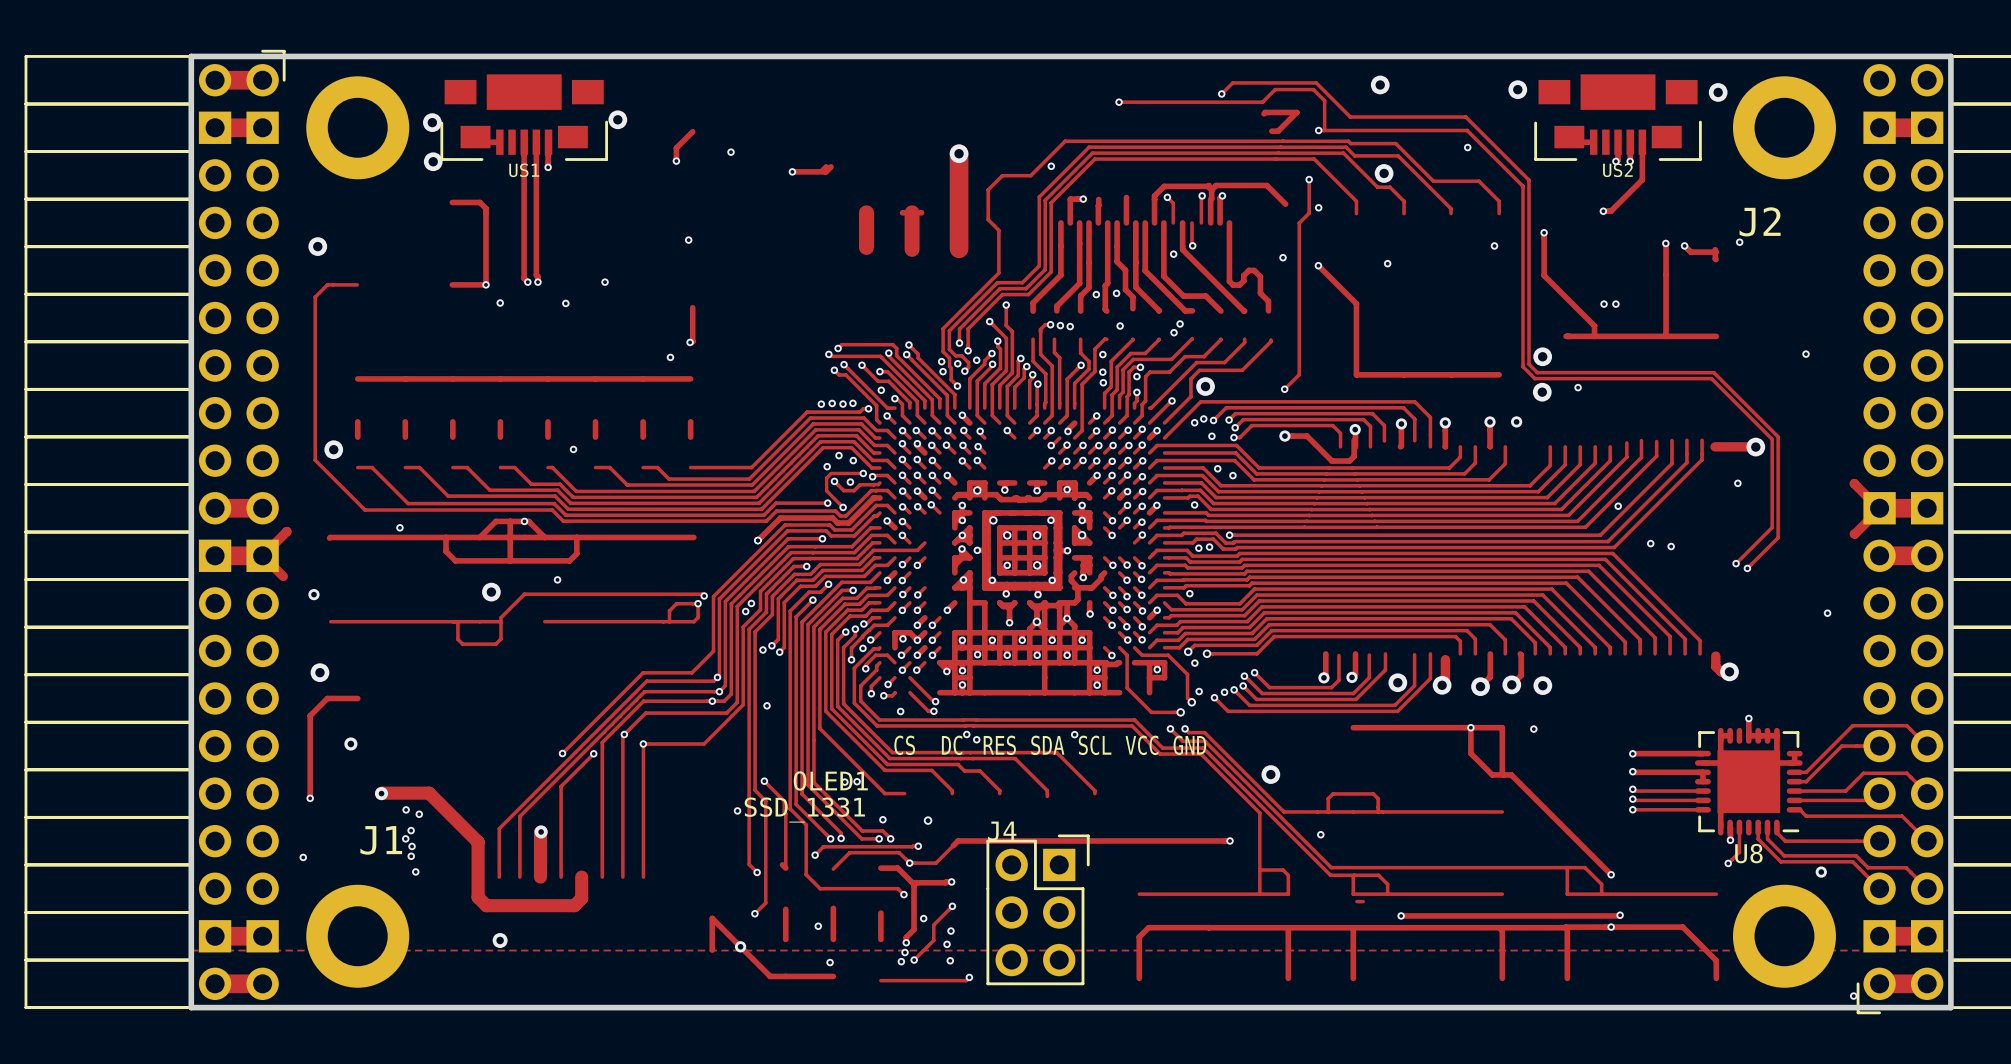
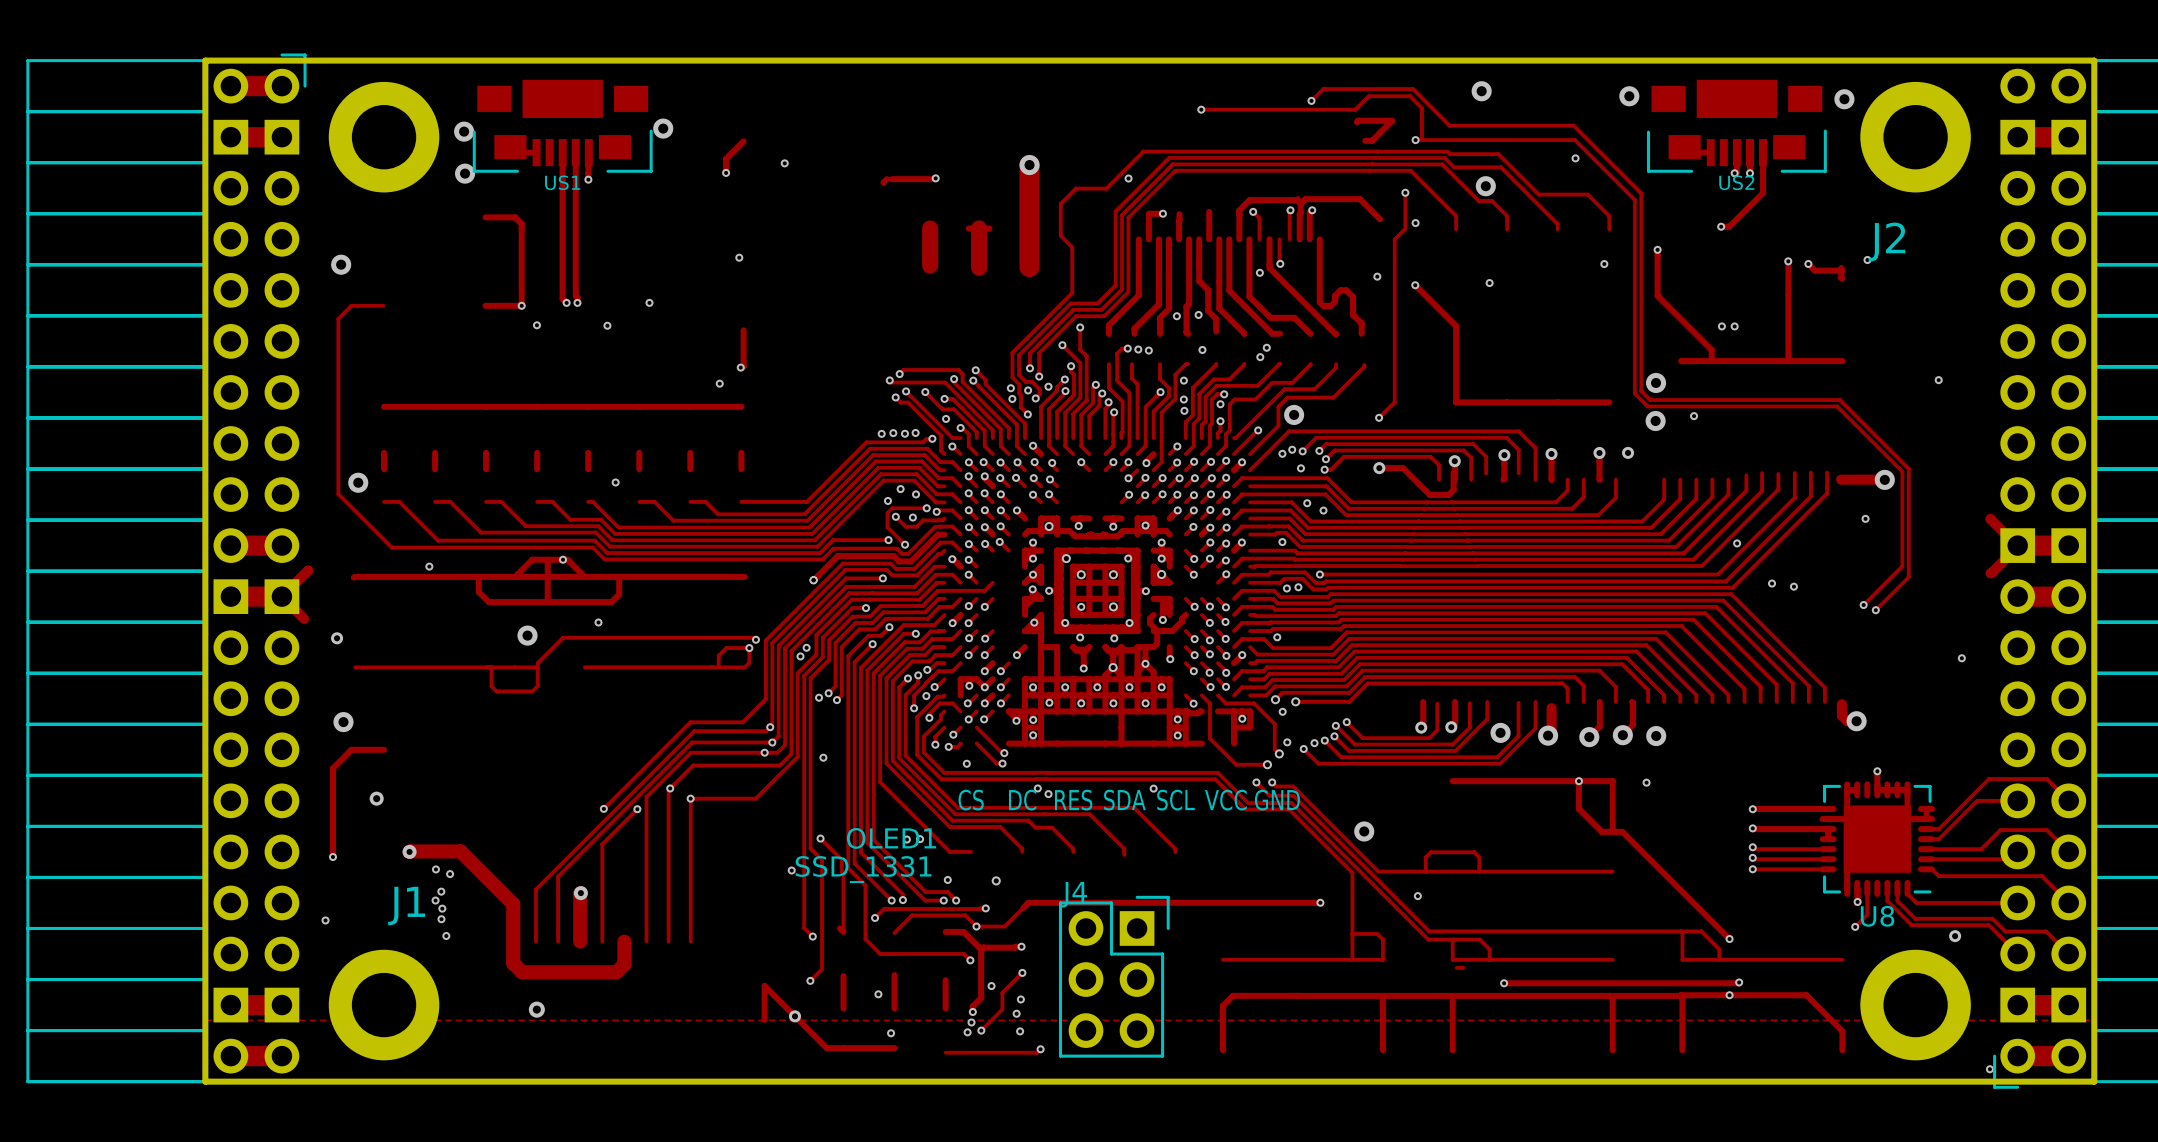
track: (831, 166) (826, 171) (792, 171) -> (892, 179) (935, 178)
via position: (792, 171) -> (935, 178)

